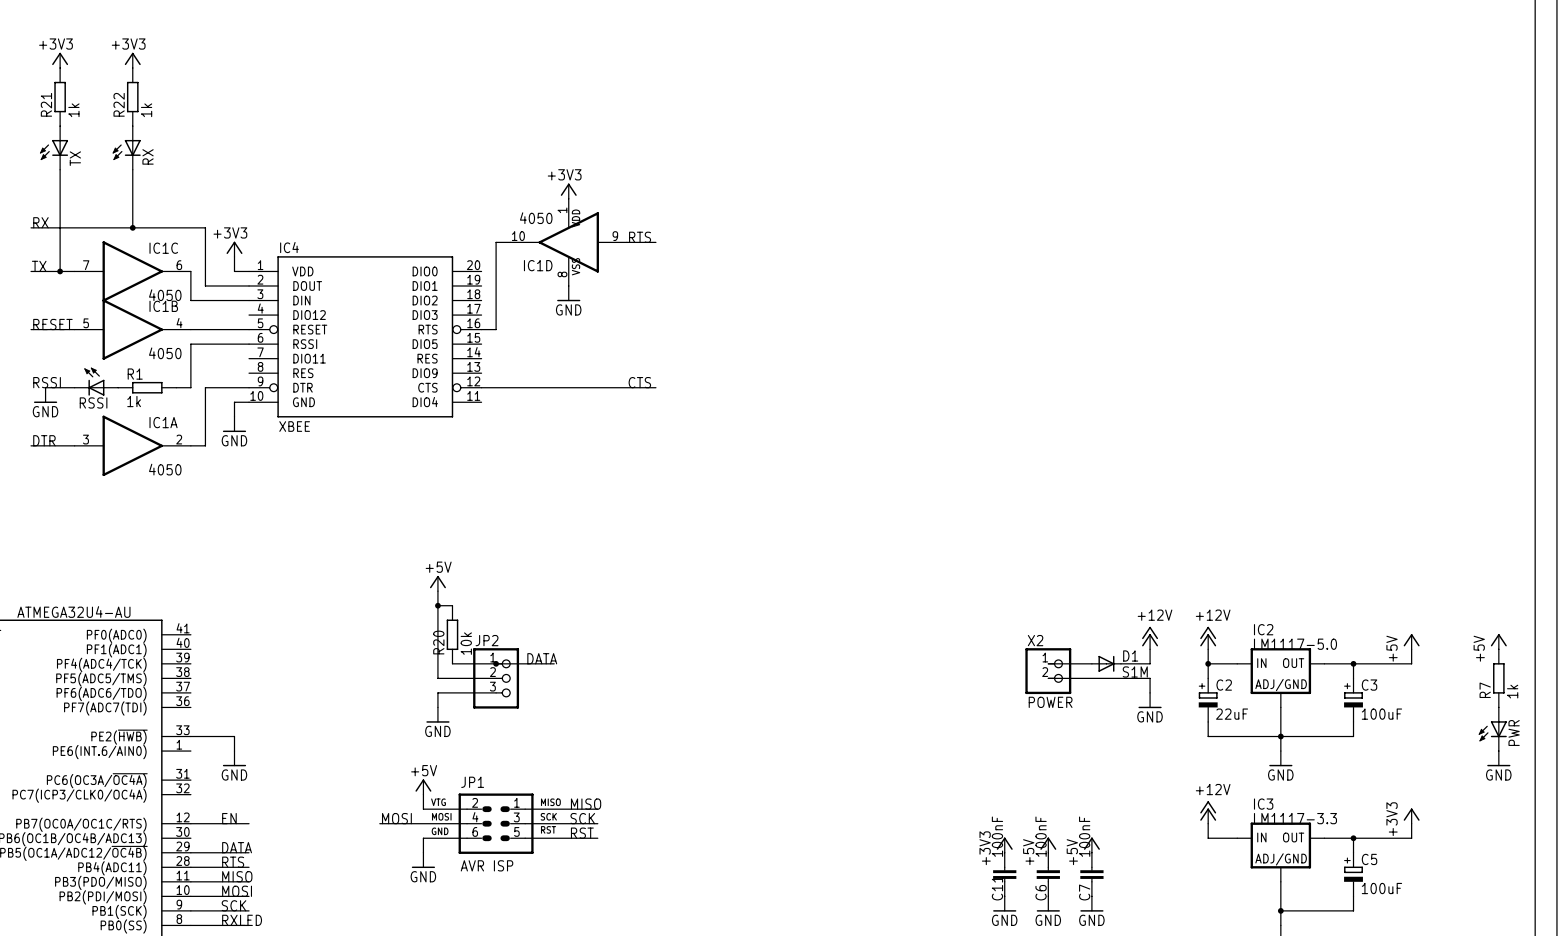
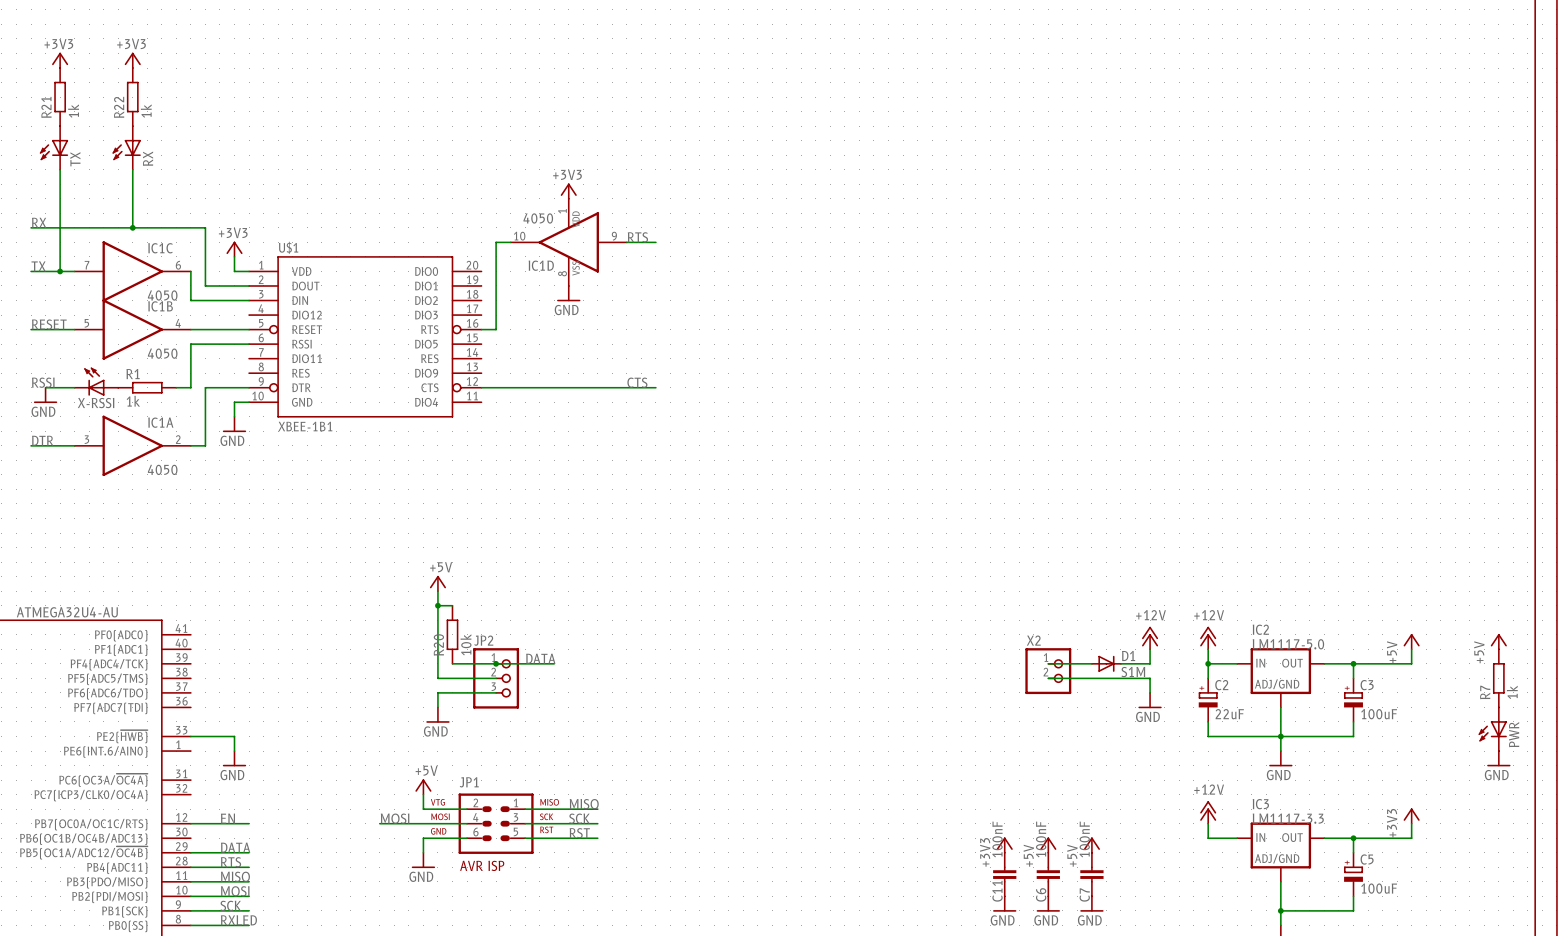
IC4 name: IC4 (289, 247) -> U$1 (288, 247)
RSSI name: RSSI (93, 402) -> X-RSSI (96, 403)
IC4 value: XBEE (294, 426) -> XBEE-1B1 (305, 426)
X2 value: POWER (1050, 702) -> none

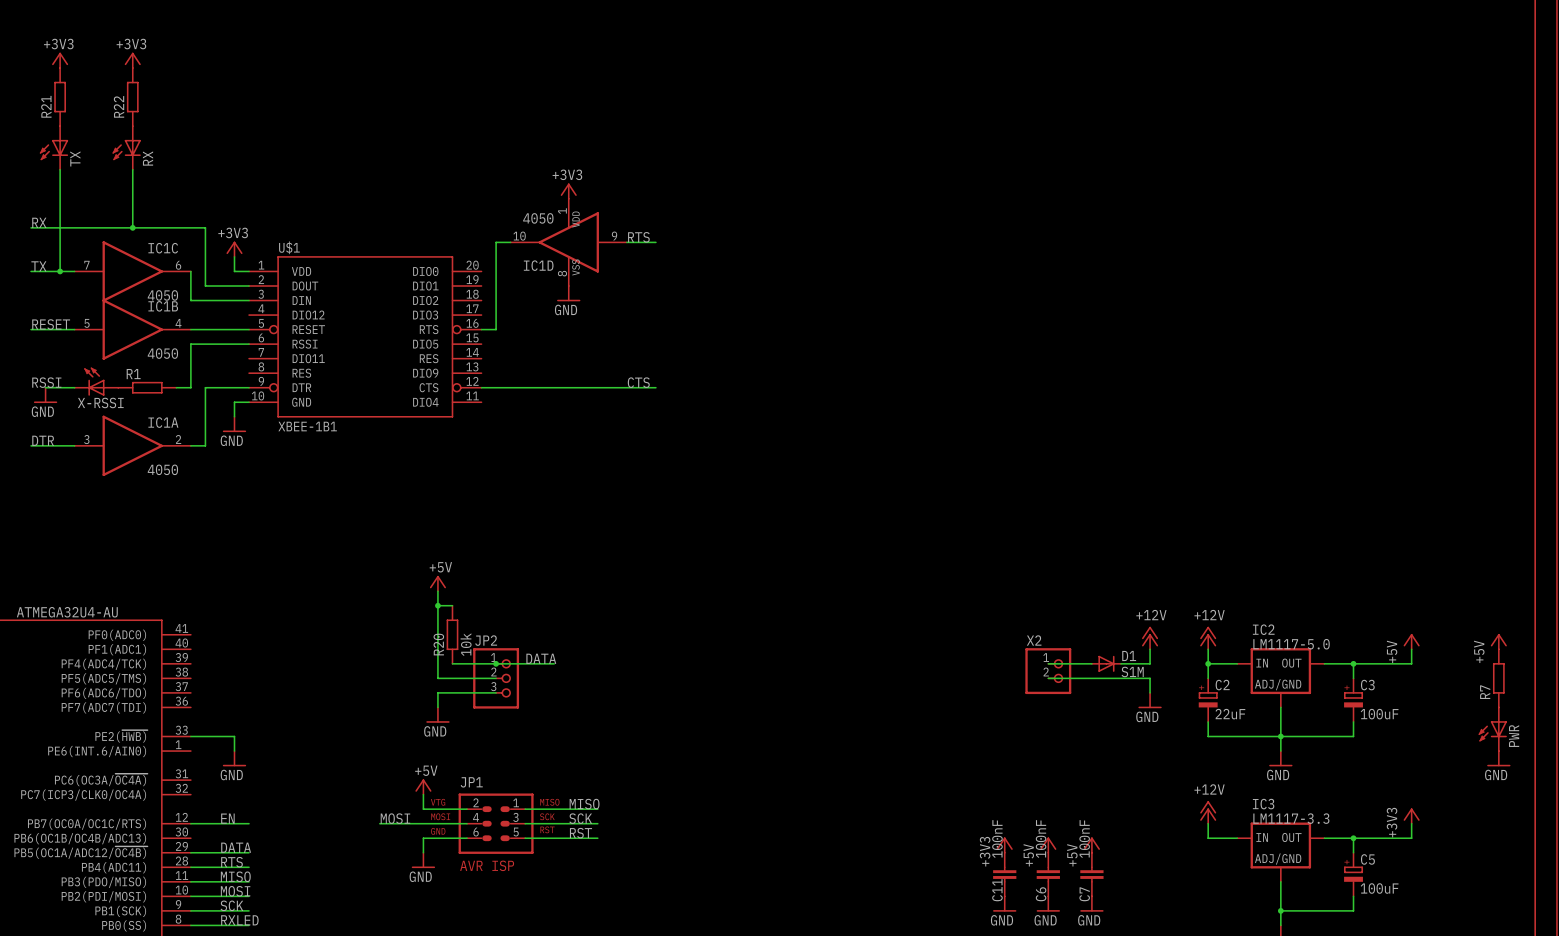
R21 value: 1k (73, 111) -> none
R22 value: 1k (146, 111) -> none
R1 value: 1k (133, 401) -> none
R7 value: 1k (1512, 692) -> none

